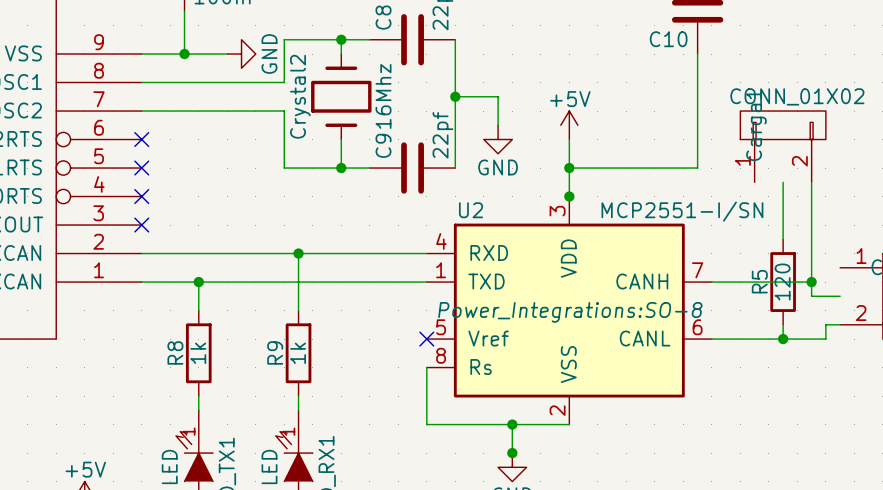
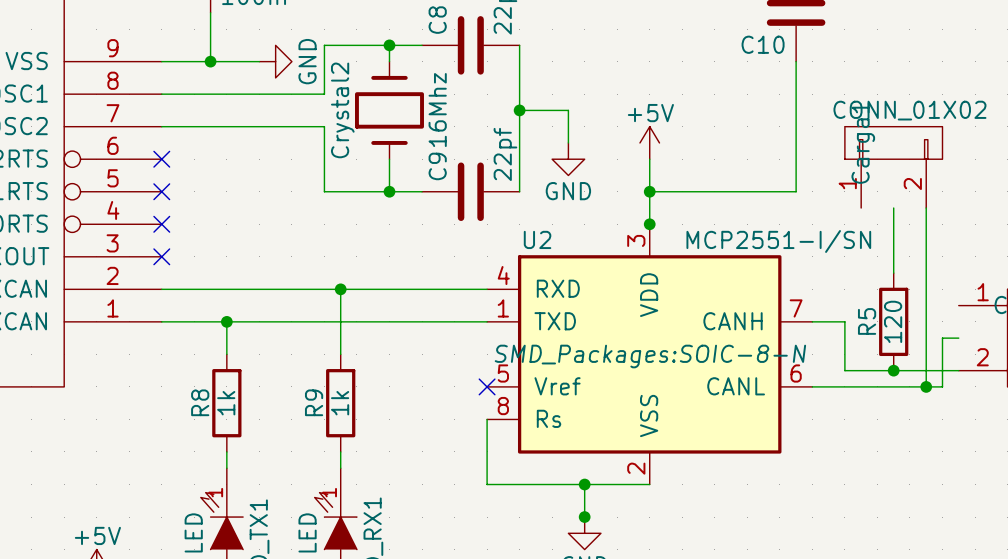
wire: (740, 282) (811, 282) -> (844, 321) (844, 370) (942, 370) (942, 338)
junction: (811, 282) -> none
wire: (811, 296) (825, 296) -> (926, 338) (926, 386)
U2 text: Power_Integrations:SO-8 (570, 312) -> SMD_Packages:SOIC-8-N (650, 356)
wire: (783, 324) (783, 339) -> none
junction: none -> (893, 370)
junction: (783, 339) -> none
junction: none -> (926, 386)

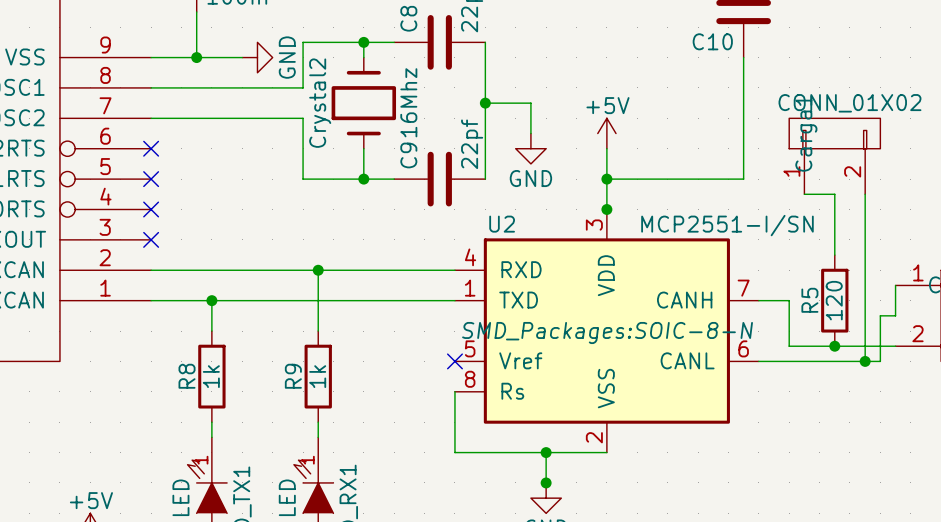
wire: none -> (804, 194) (834, 194)
wire: none -> (895, 285) (895, 315)

